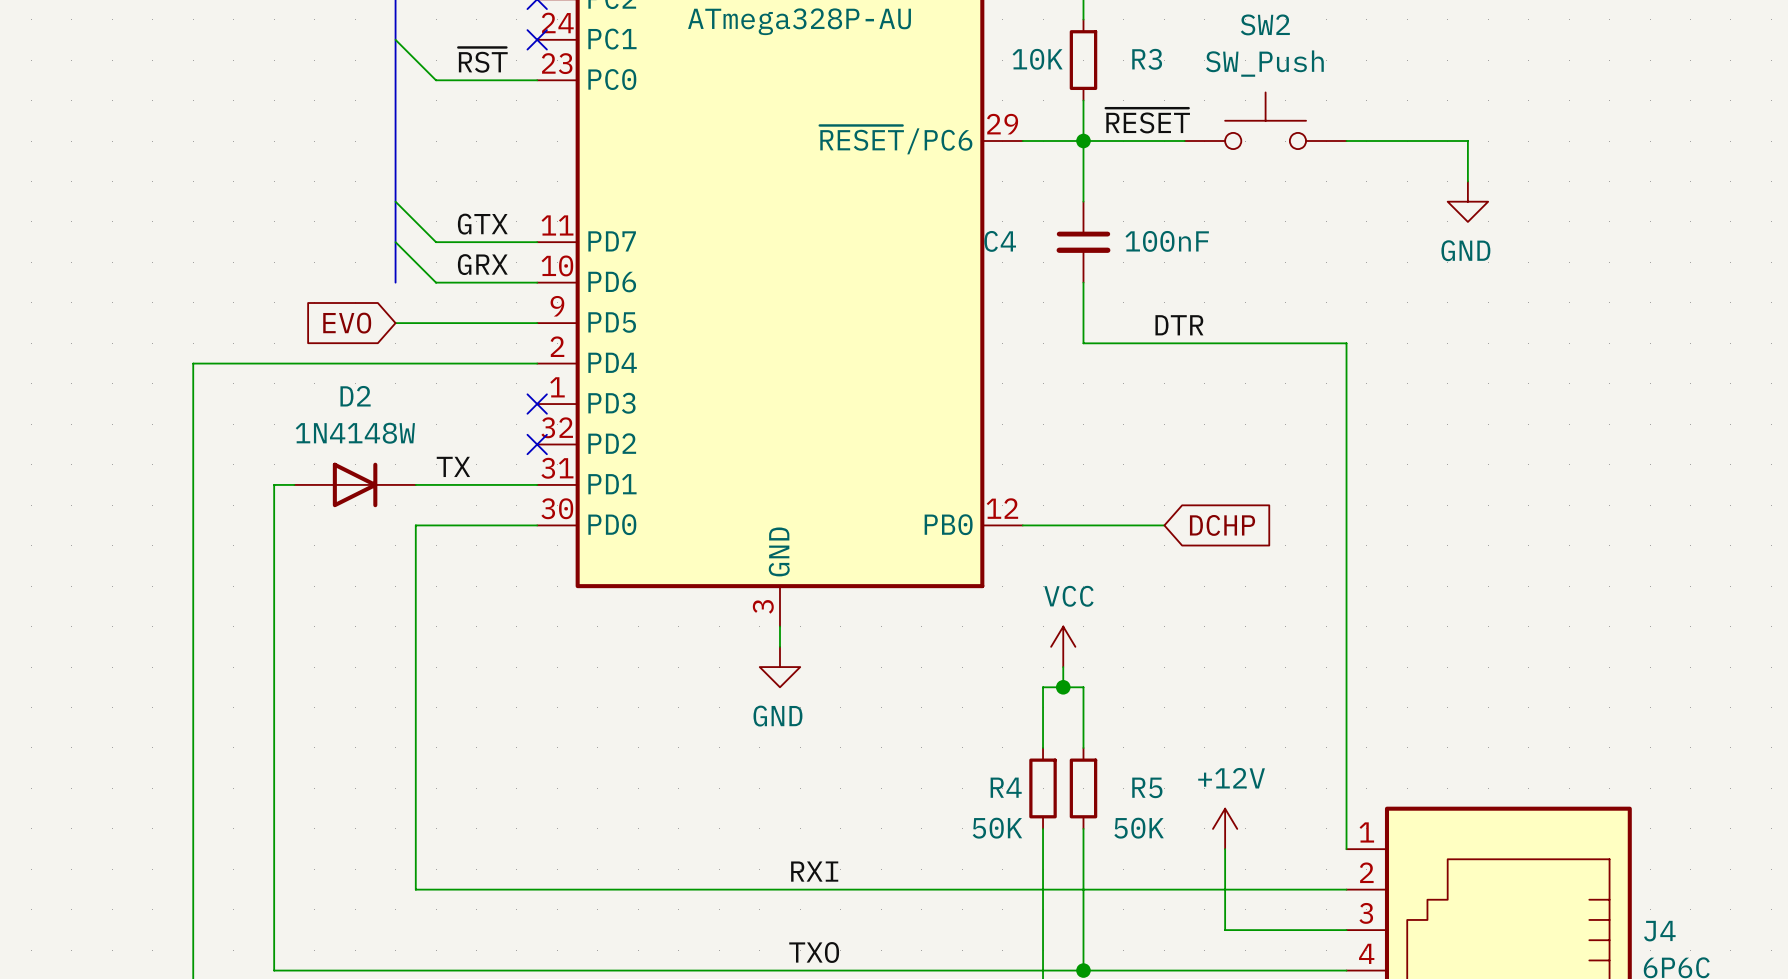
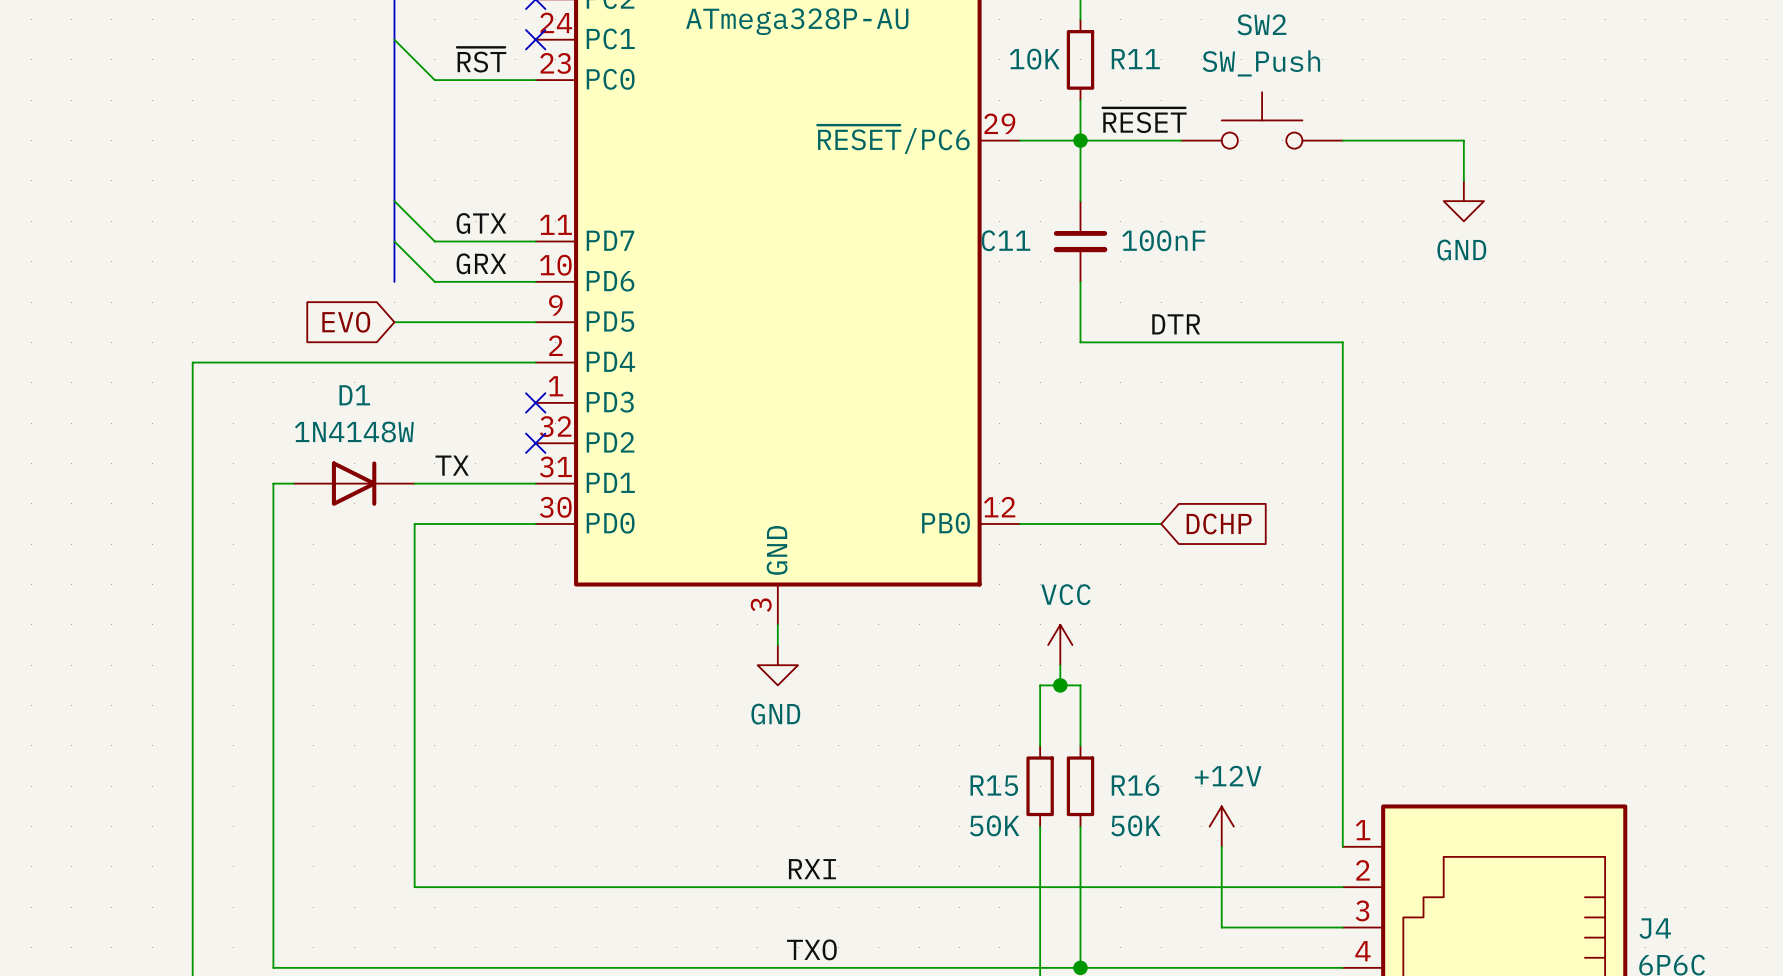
R3 name: R3 (1147, 59) -> R11 (1135, 59)
C4 name: C4 (1000, 241) -> C11 (1005, 240)
D2 name: D2 (355, 396) -> D1 (354, 395)
R4 name: R4 (1006, 787) -> R15 (994, 785)
R5 name: R5 (1147, 787) -> R16 (1135, 785)

